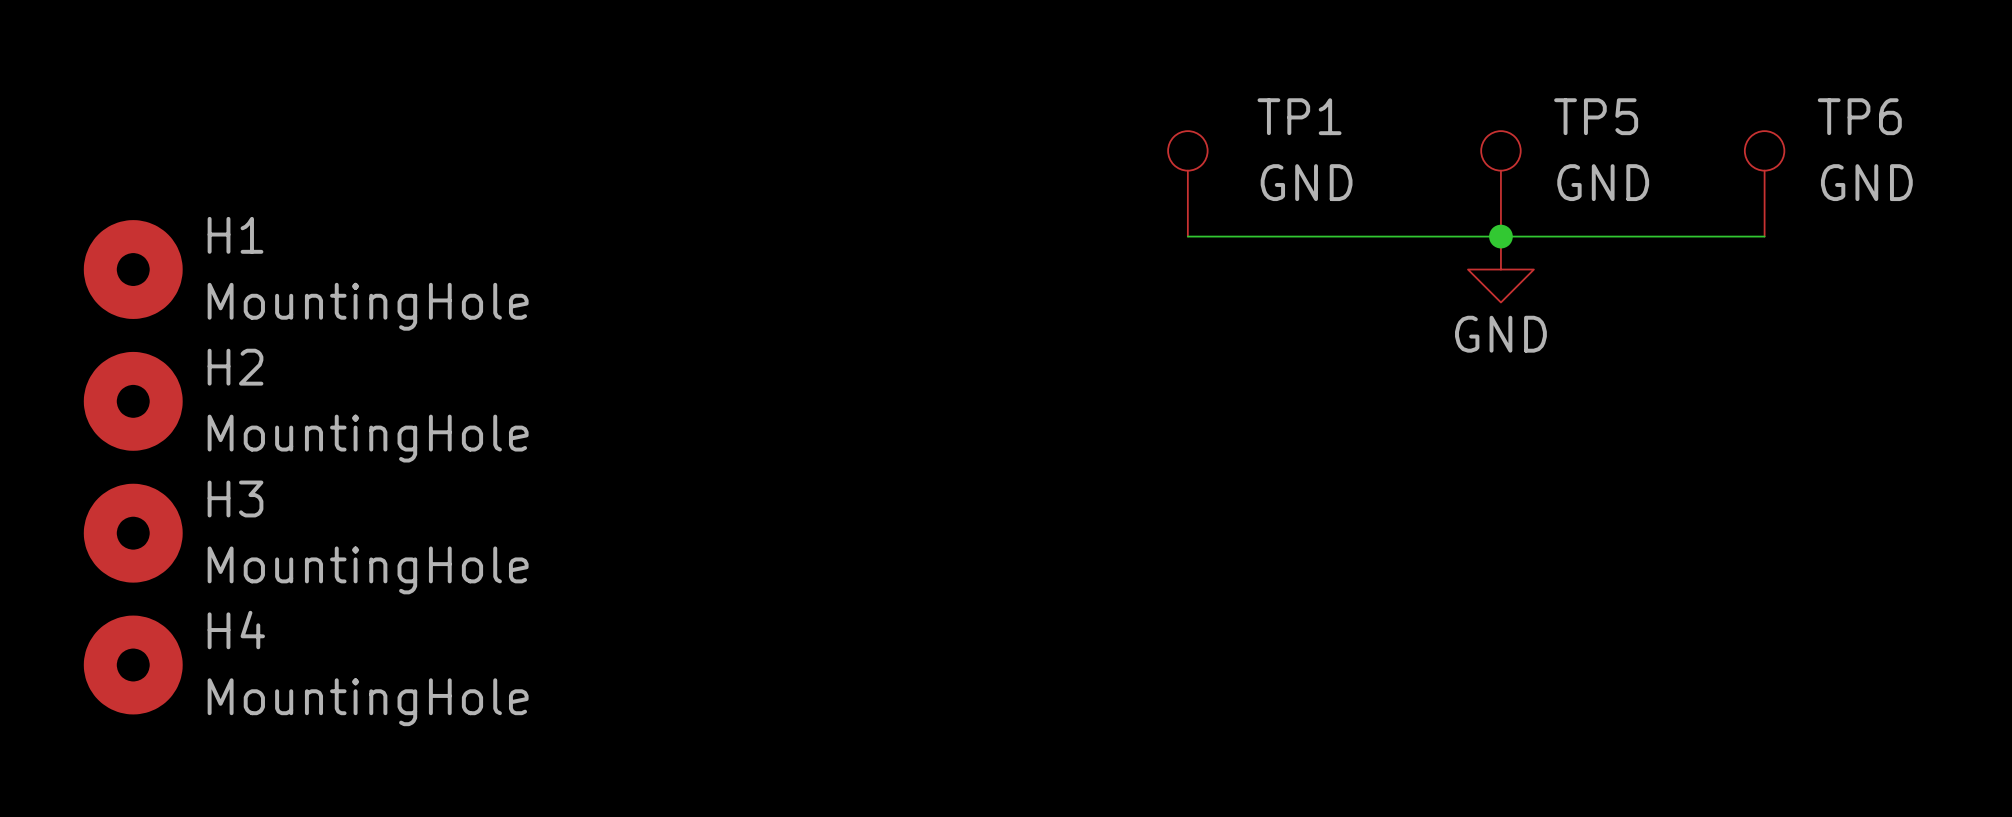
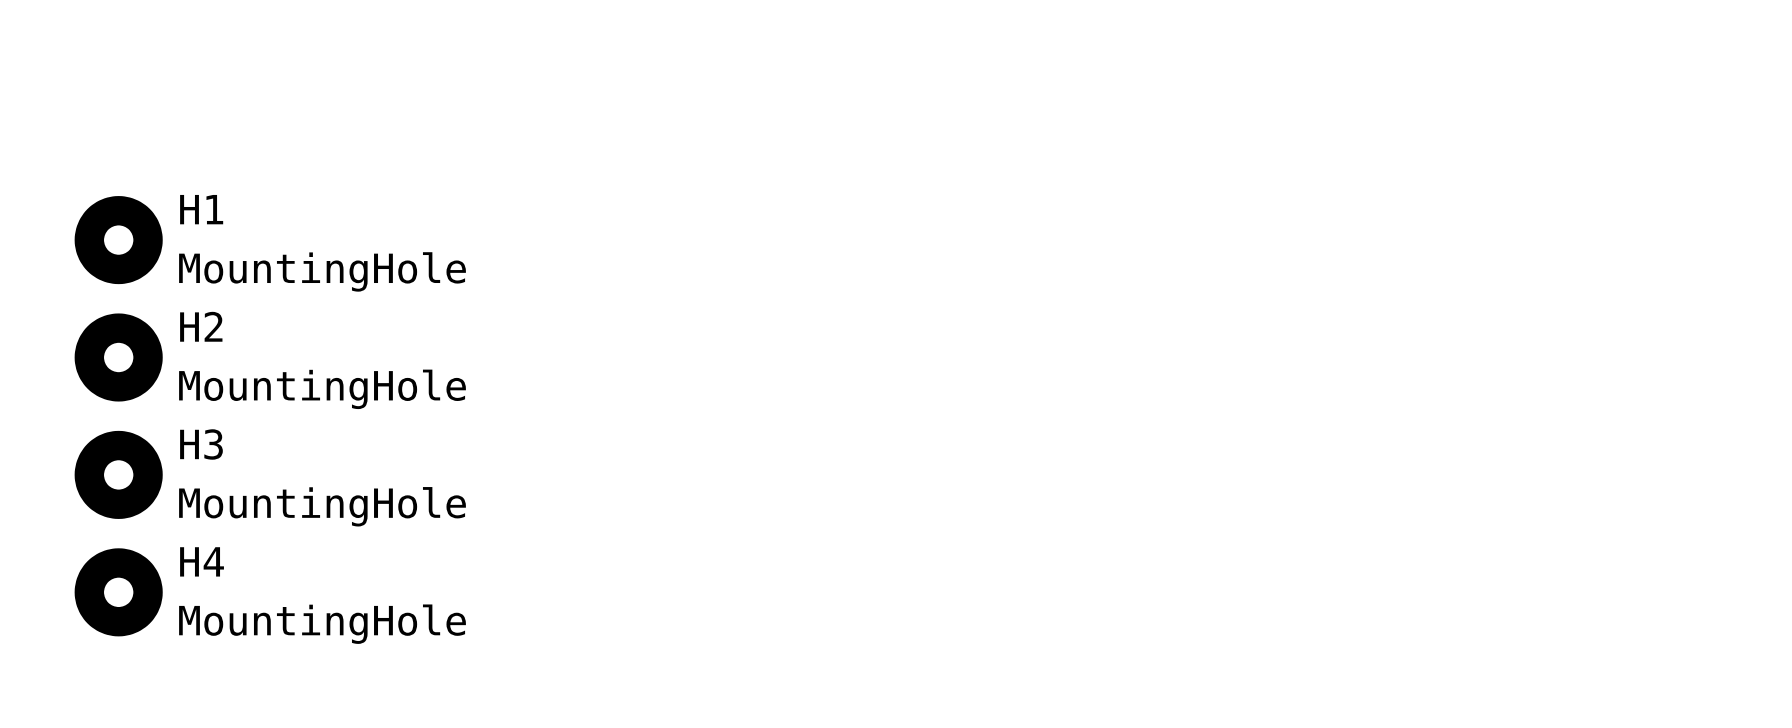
TP1: GND (1187, 183) -> none
TP5: GND (1500, 183) -> none
TP6: GND (1764, 183) -> none
wire: (1187, 236) (1764, 236) -> none
junction: (1500, 236) -> none
power symbol: GND (1500, 269) -> none

